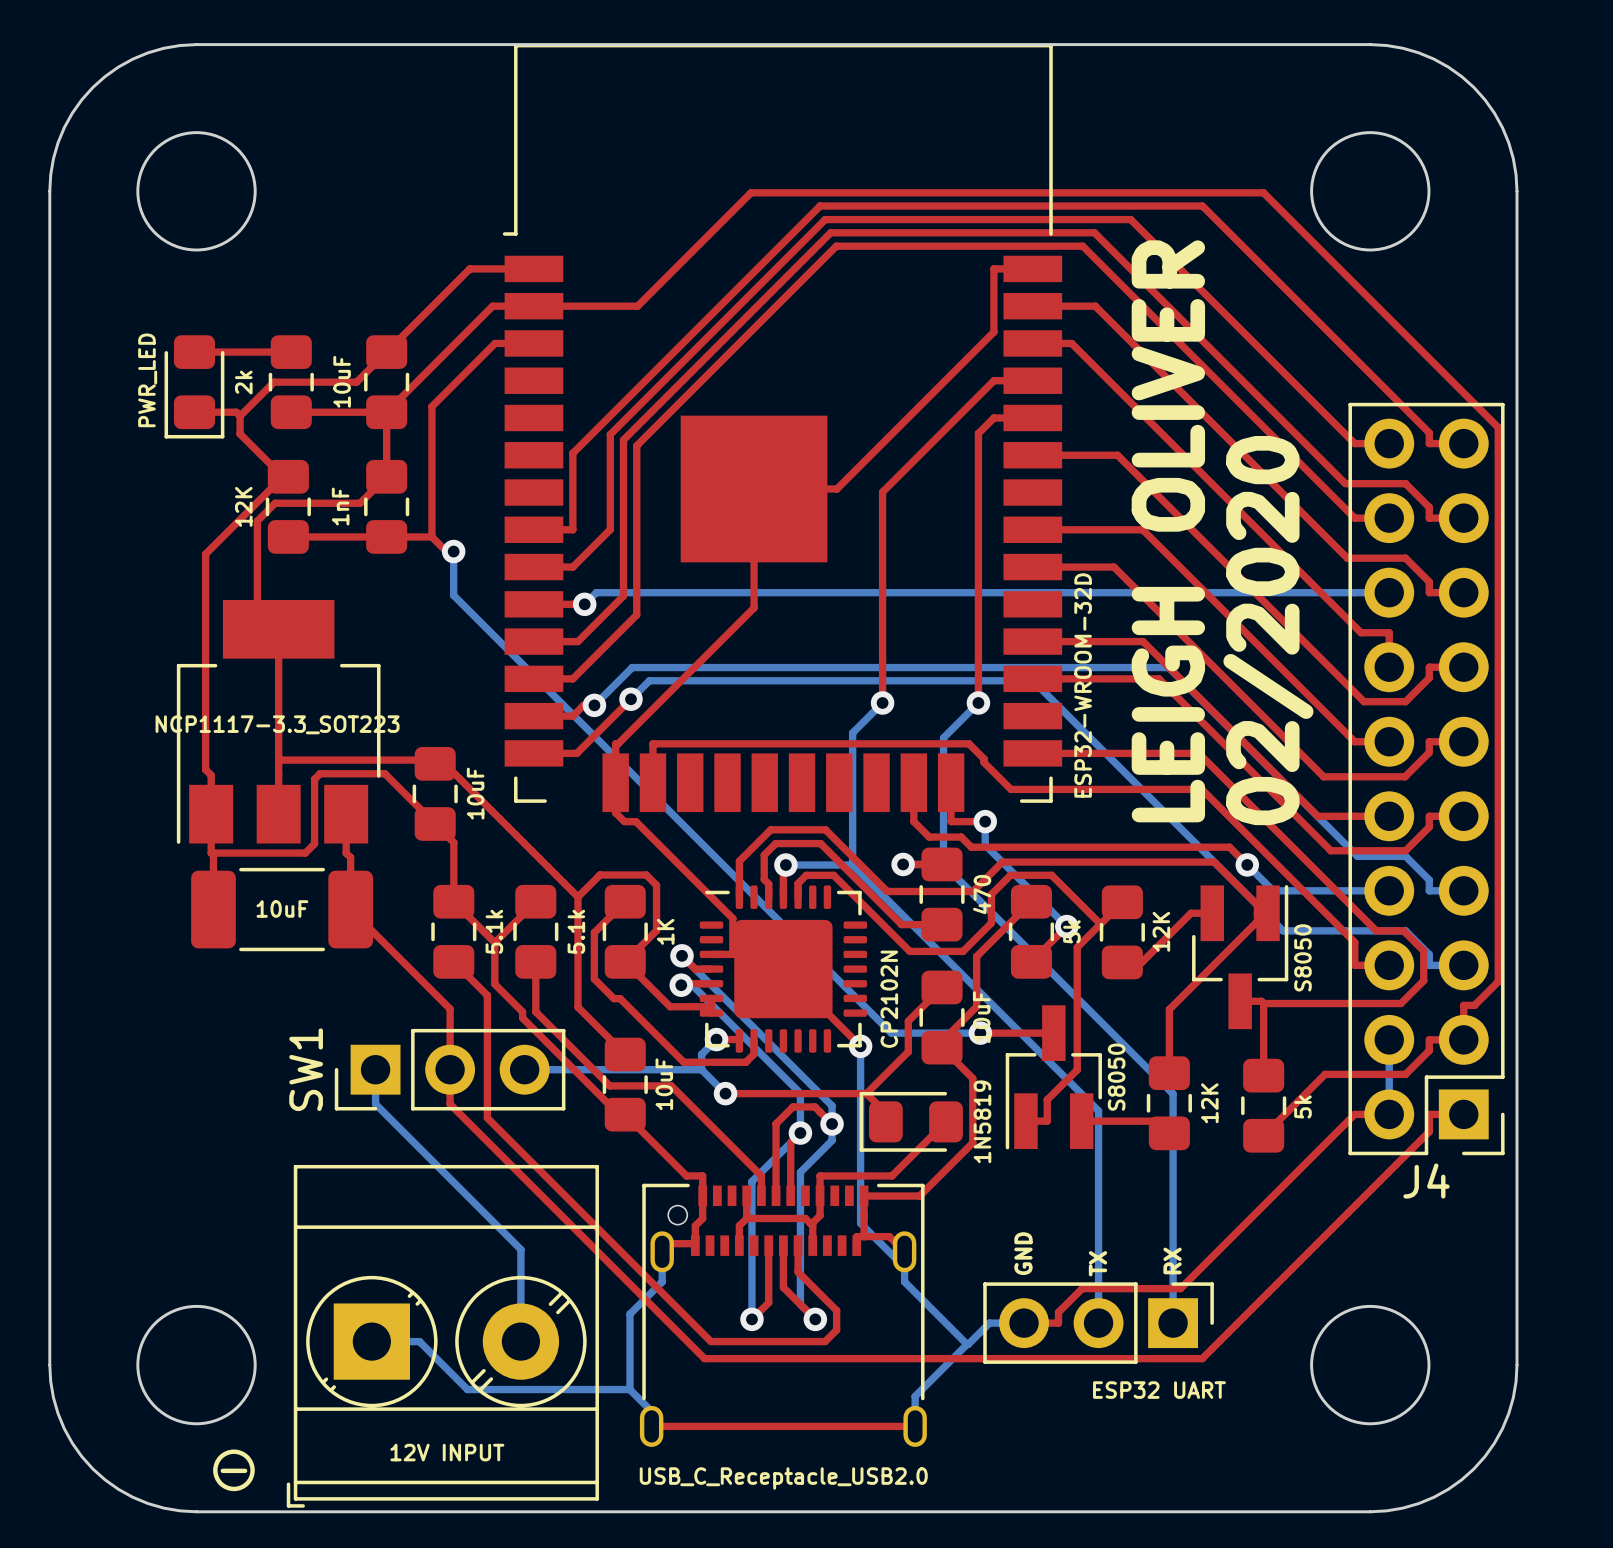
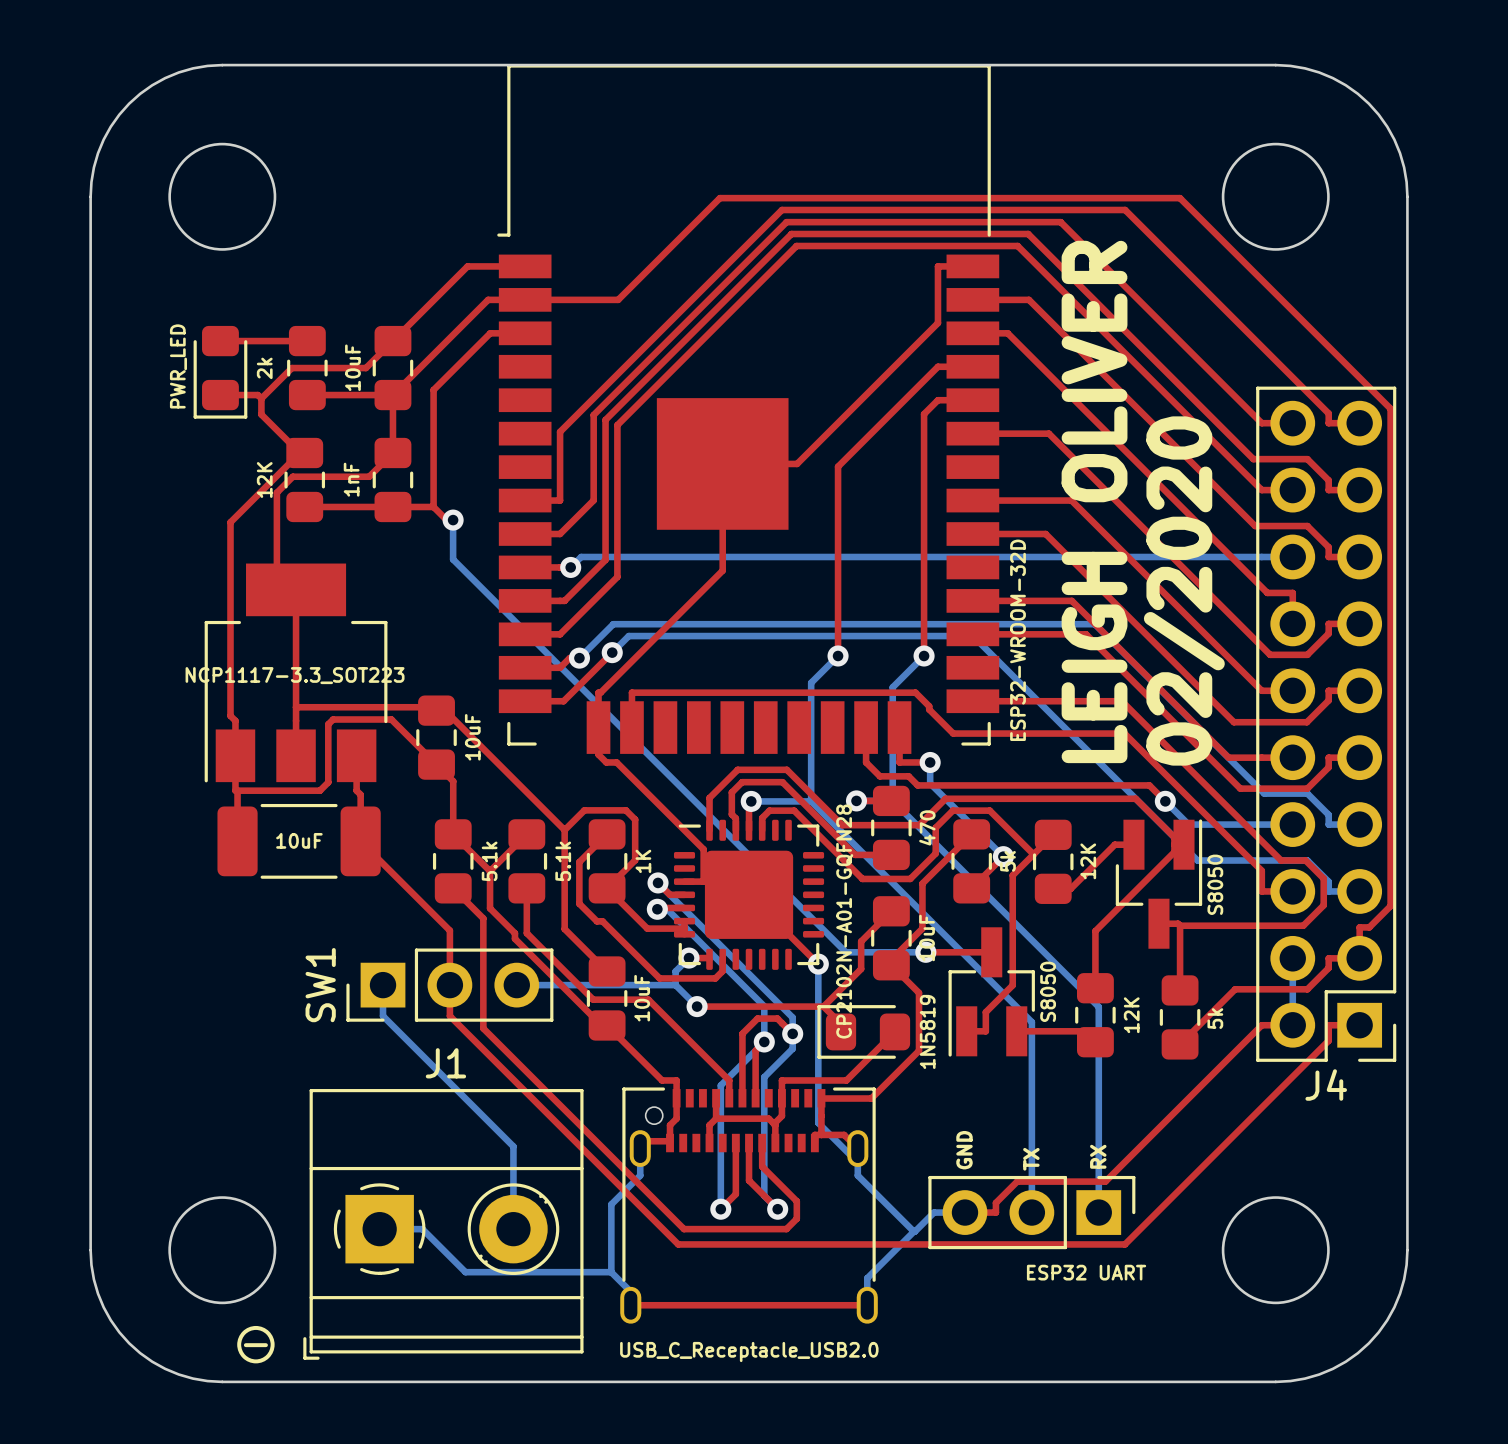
part value: CP2102N (889, 999) -> CP2102N-A01-GQFN28 (844, 921)
part: 12V INPUT (442, 1336) -> none
J1: none -> (443, 1224)

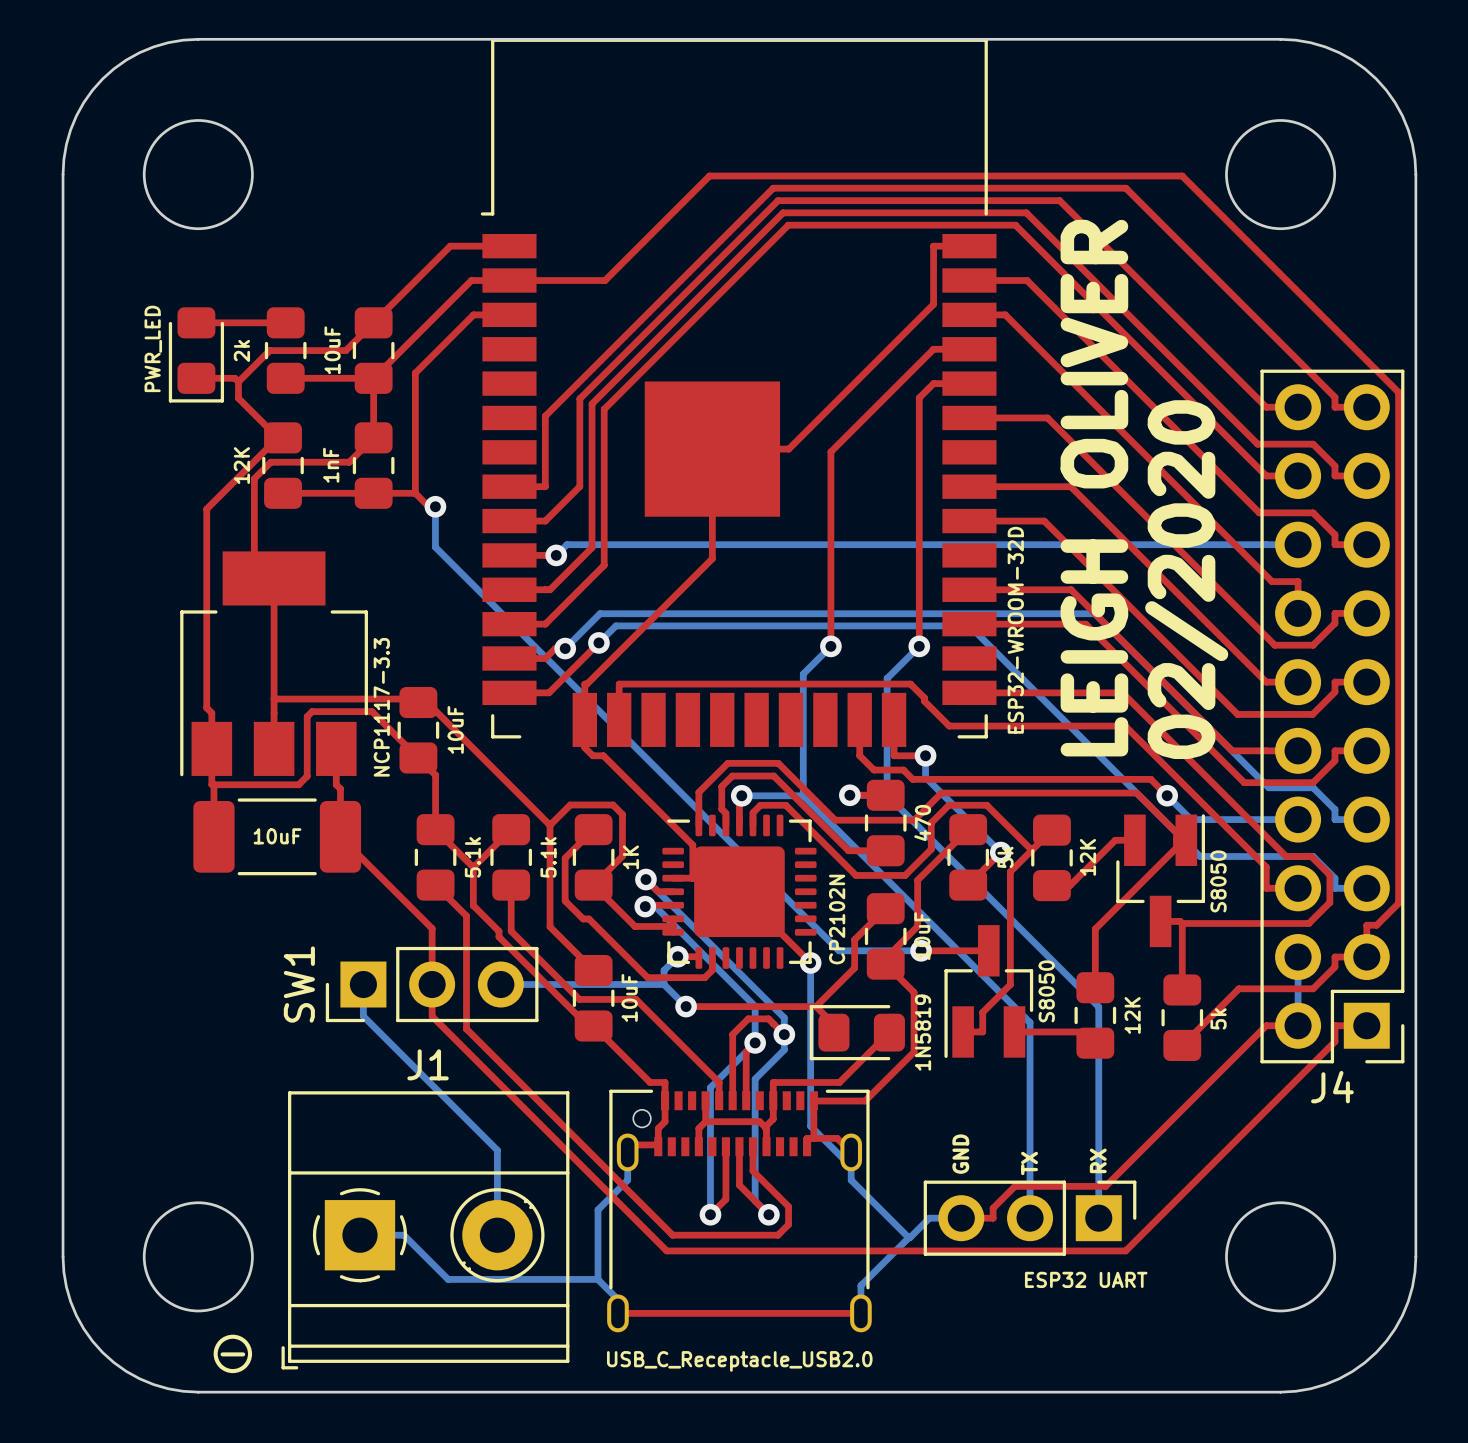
part value: NCP1117-3.3_SOT223 (295, 675) -> NCP1117-3.3 (381, 707)
part value: CP2102N-A01-GQFN28 (844, 921) -> CP2102N (837, 919)

